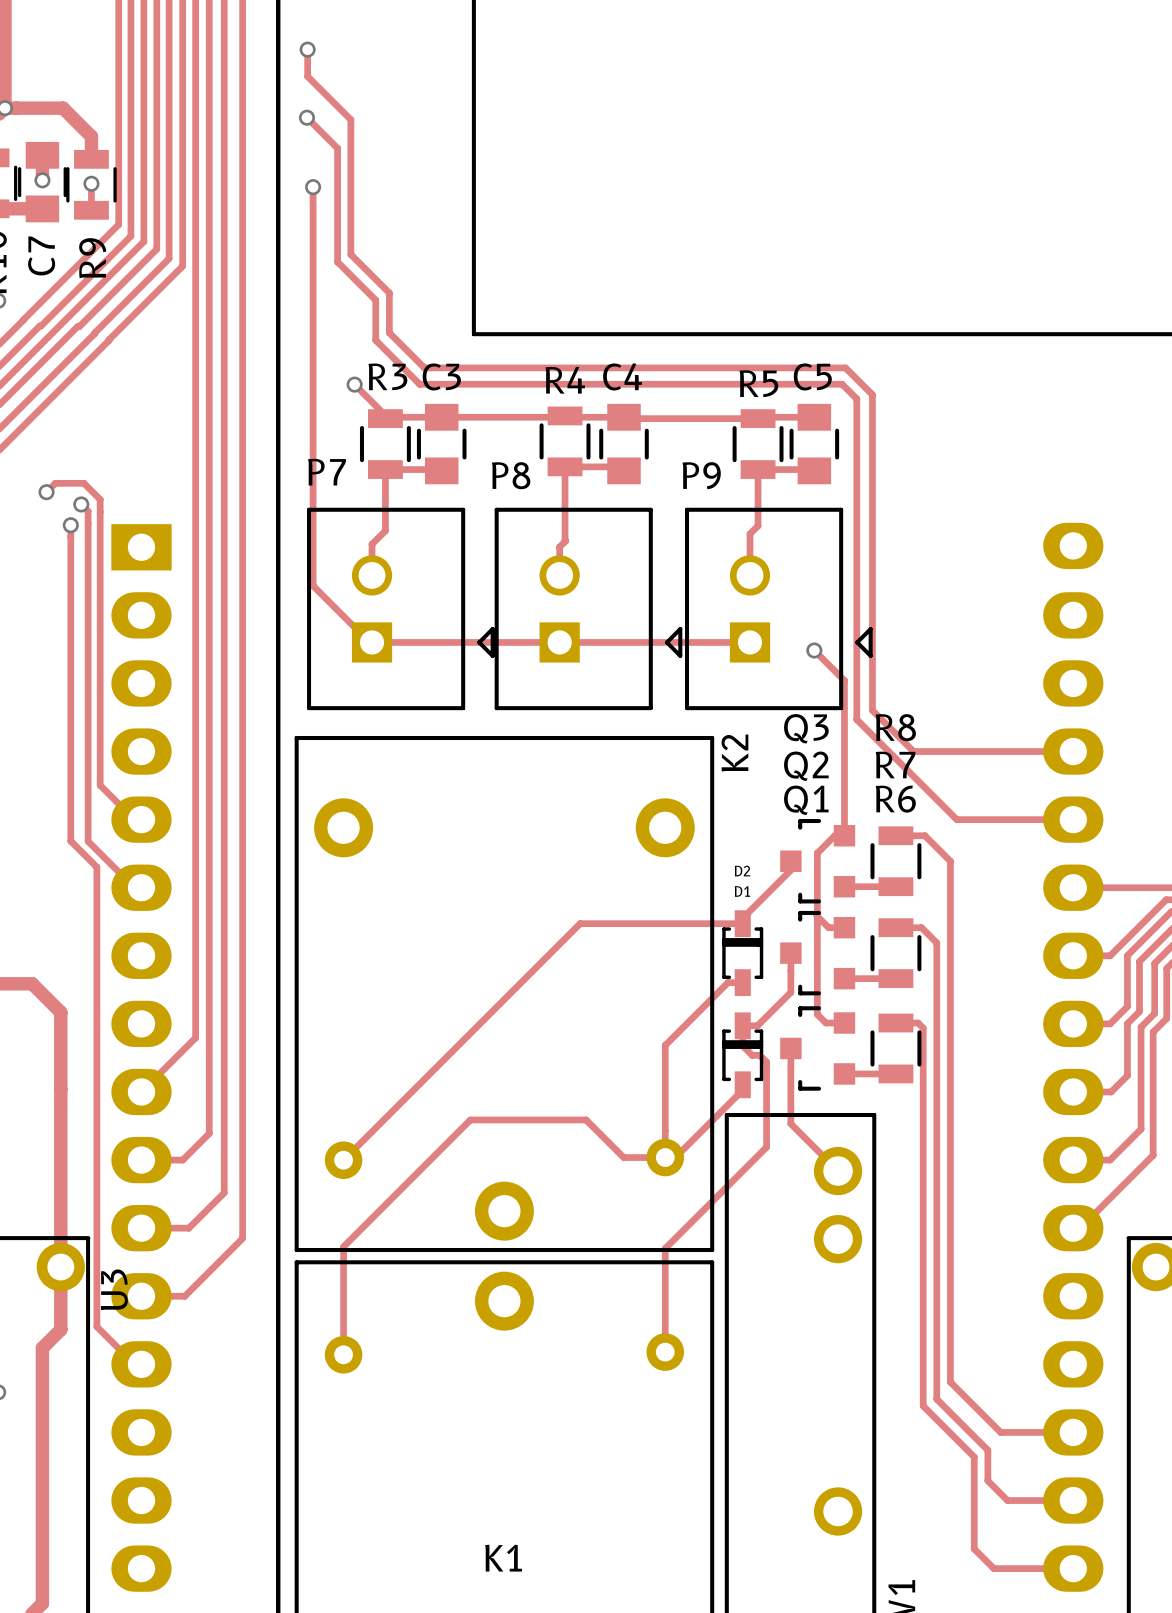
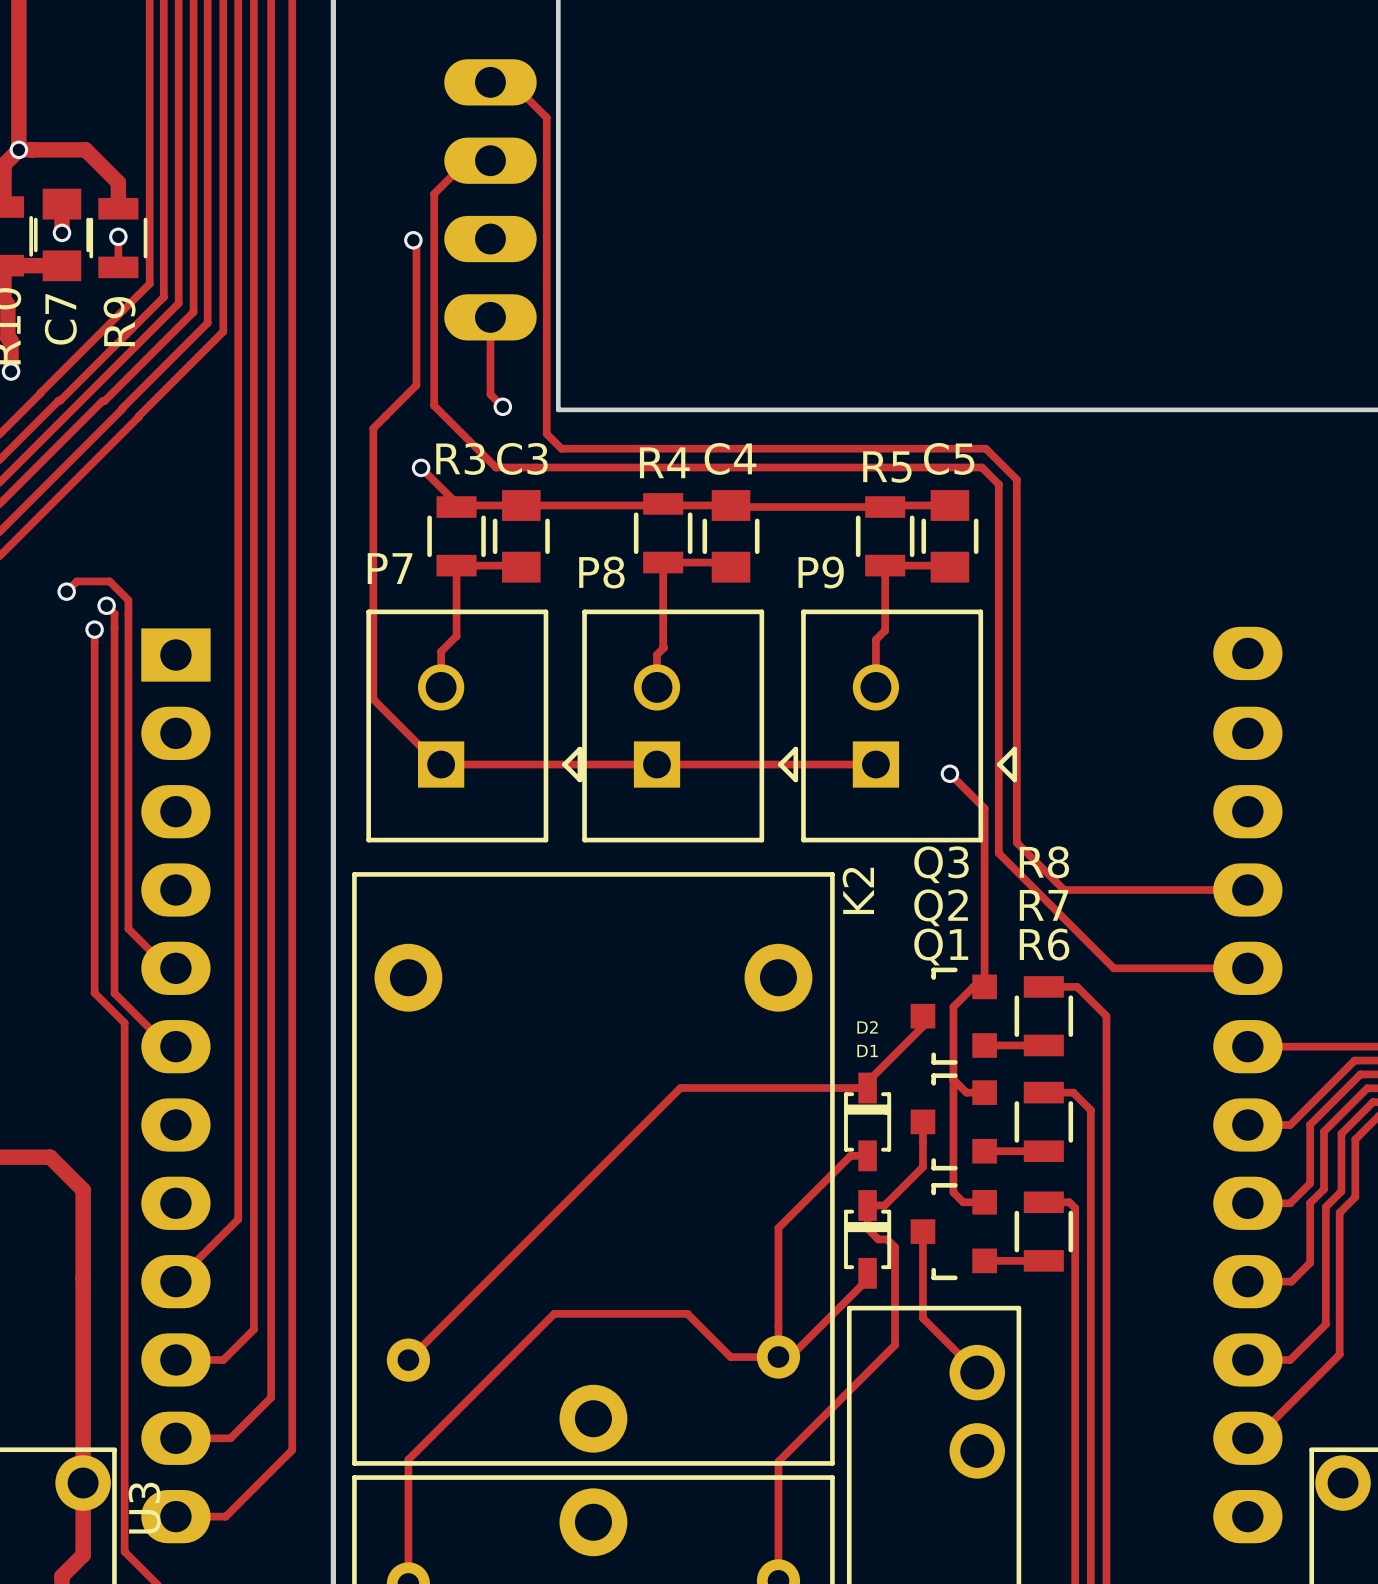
track: (307, 49) (307, 76) (350, 119) (350, 254) (389, 293) (389, 332) (424, 367) (476, 367) -> (490, 82) (511, 82) (546, 117) (546, 434) (561, 448)
via: (307, 49) -> none
track: (306, 117) (337, 148) (337, 262) (375, 300) (375, 340) -> (490, 160) (467, 160) (434, 193) (434, 405) (445, 416)
via: (306, 117) -> none
part: none -> (490, 199)
track: (313, 187) (313, 350) -> (413, 240) (416, 243) (416, 385) (373, 428)
via position: (313, 187) -> (413, 240)
track: none -> (490, 317) (490, 394) (502, 406)
via: none -> (502, 406)

